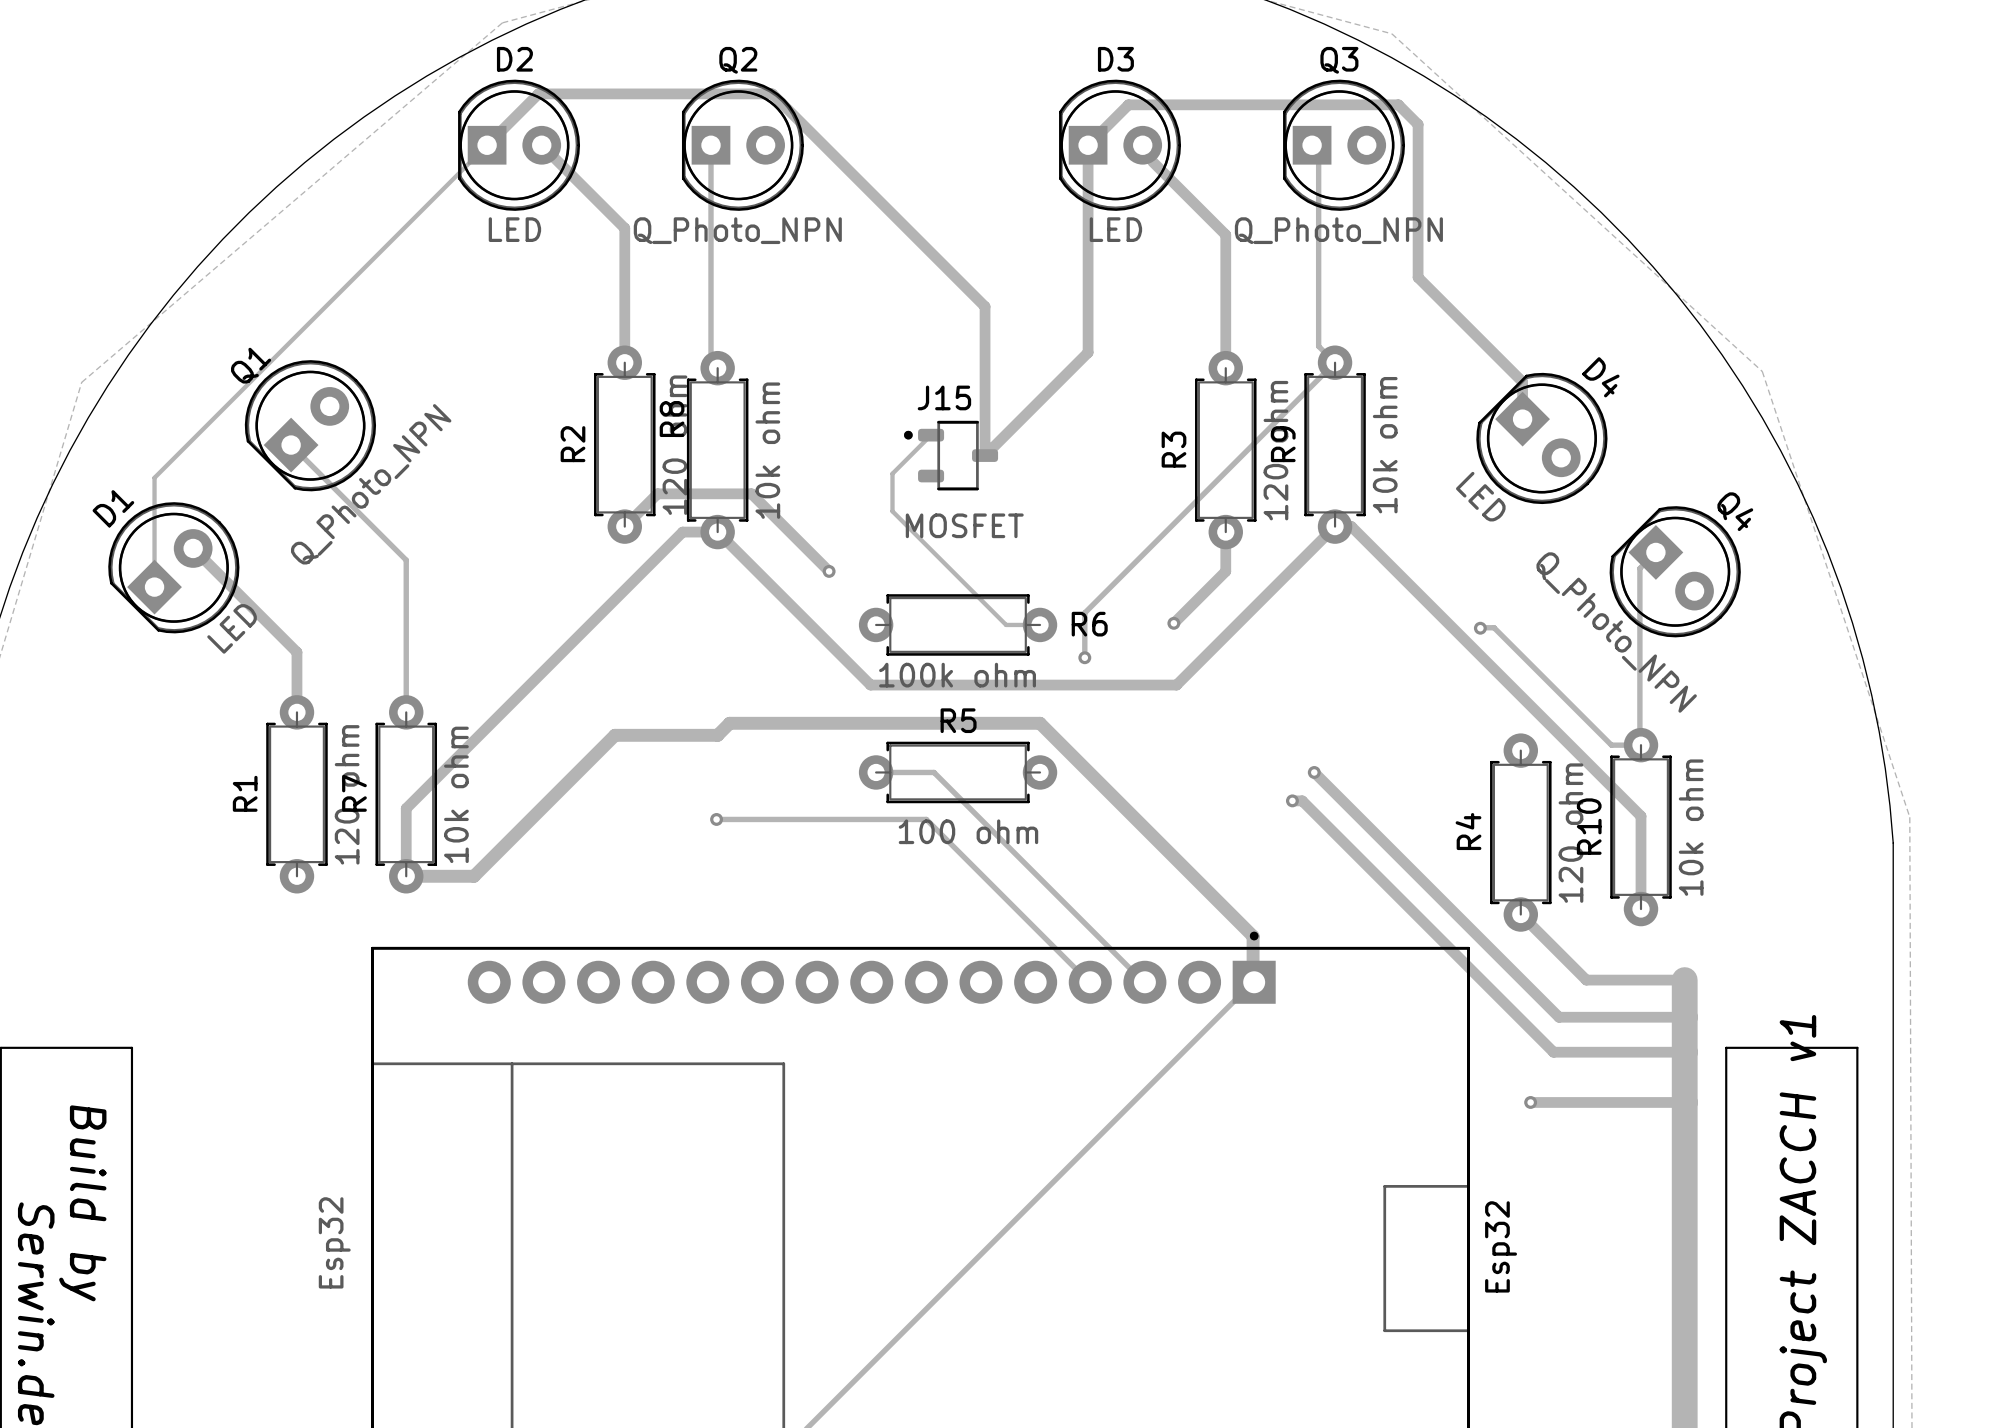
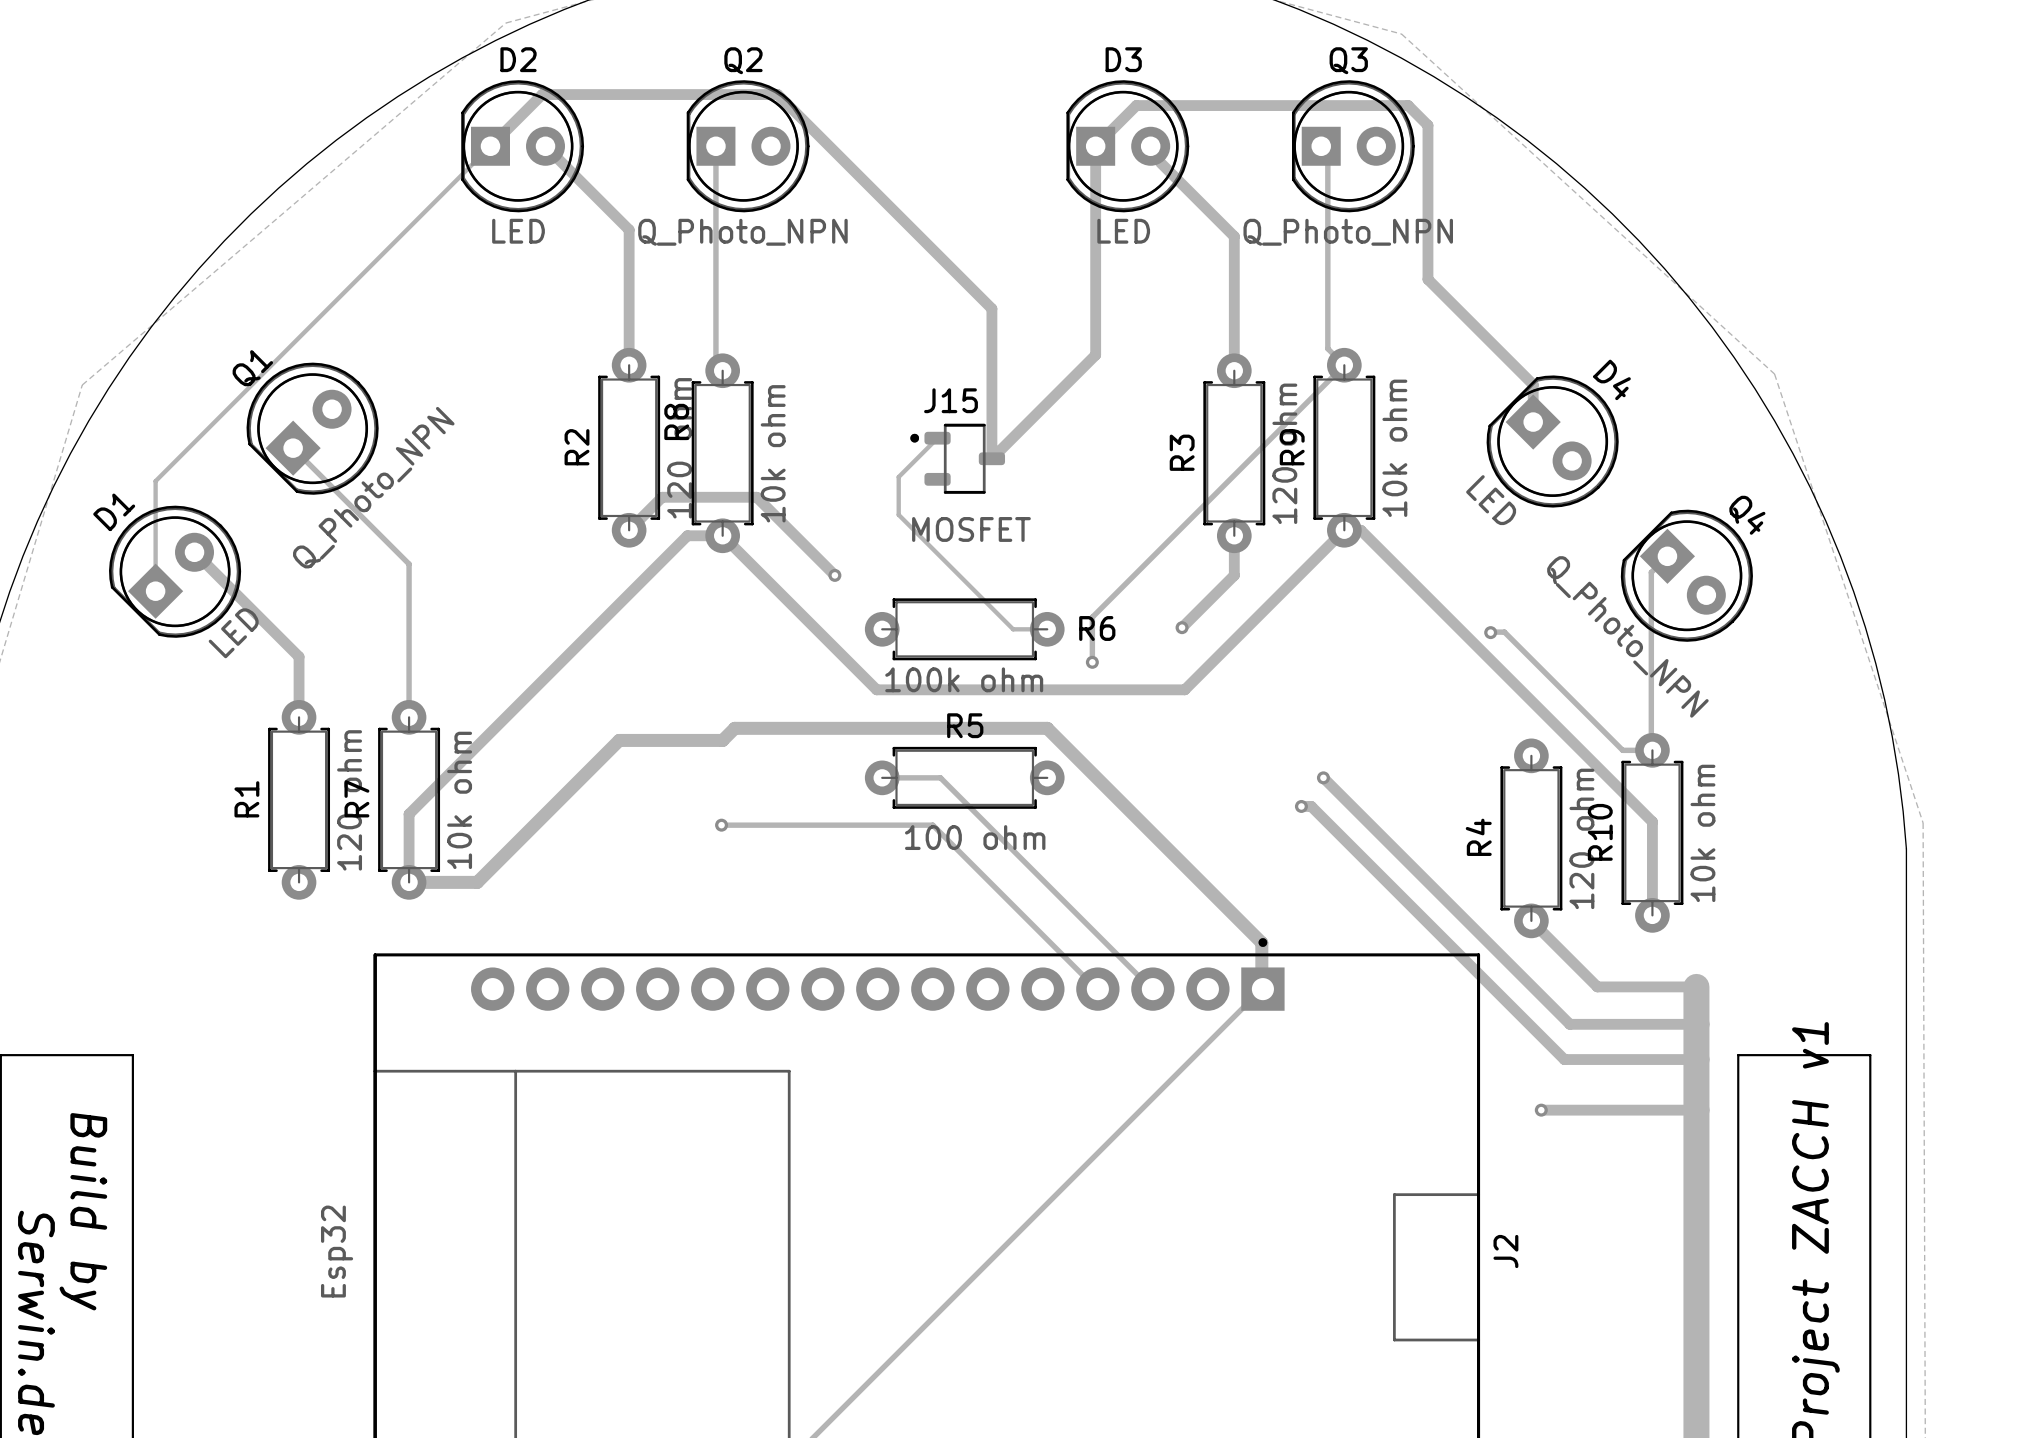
Esp32 name: Esp32 (1501, 1246) -> J2 (1505, 1251)

